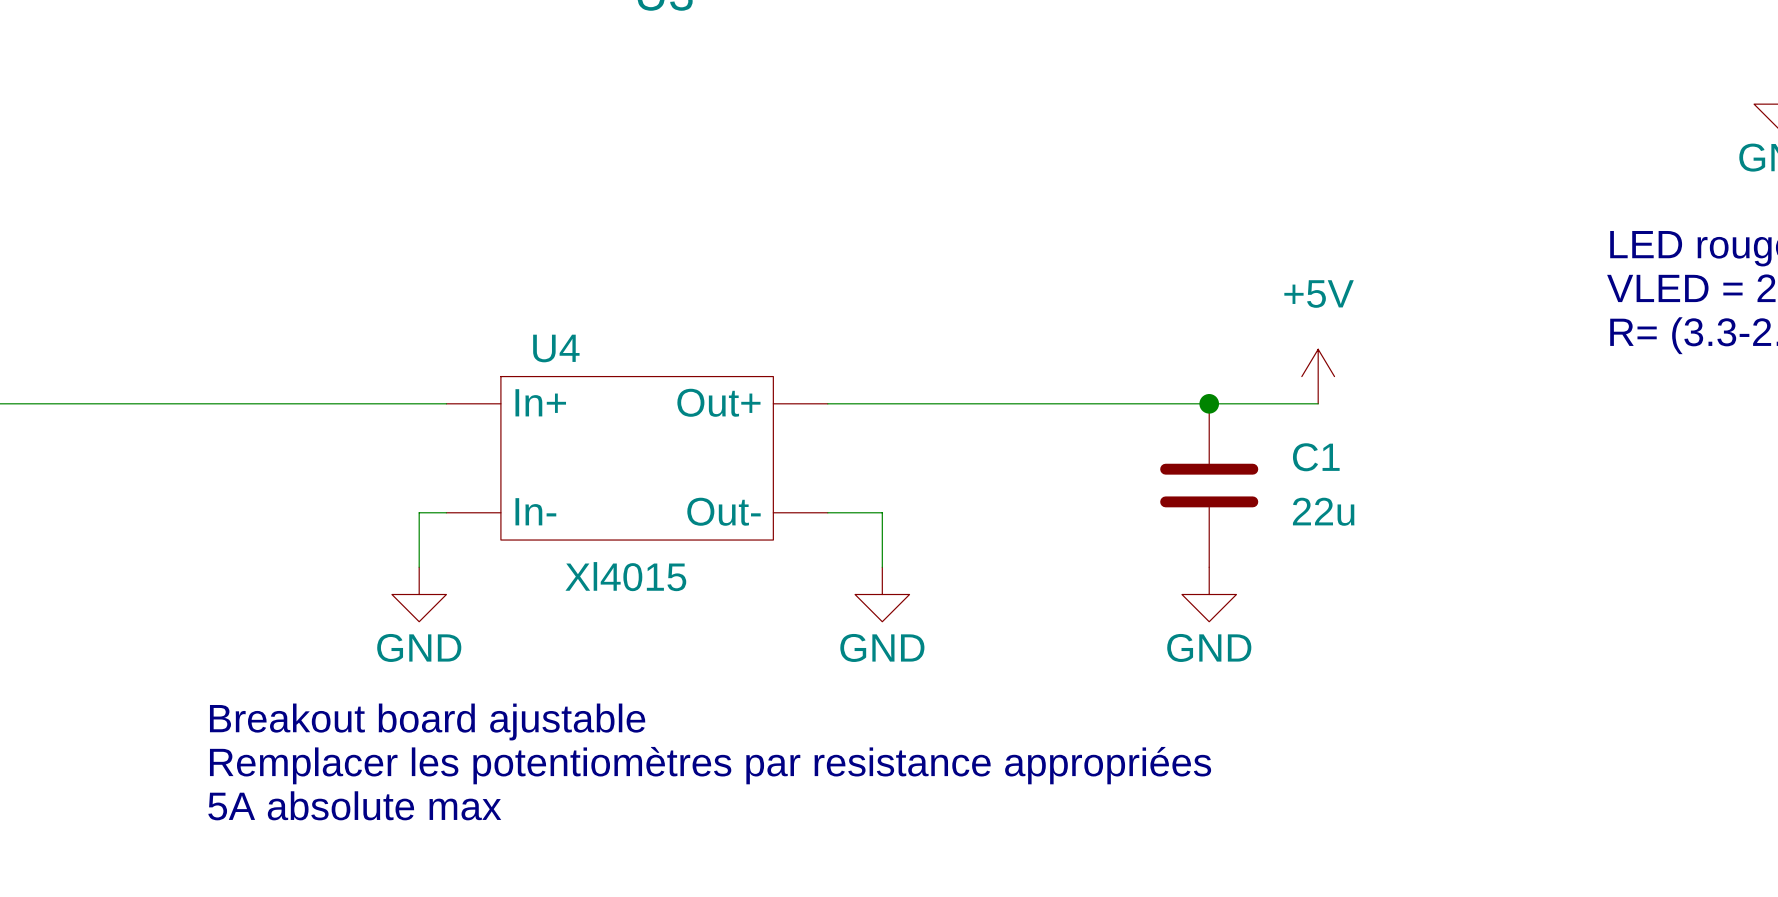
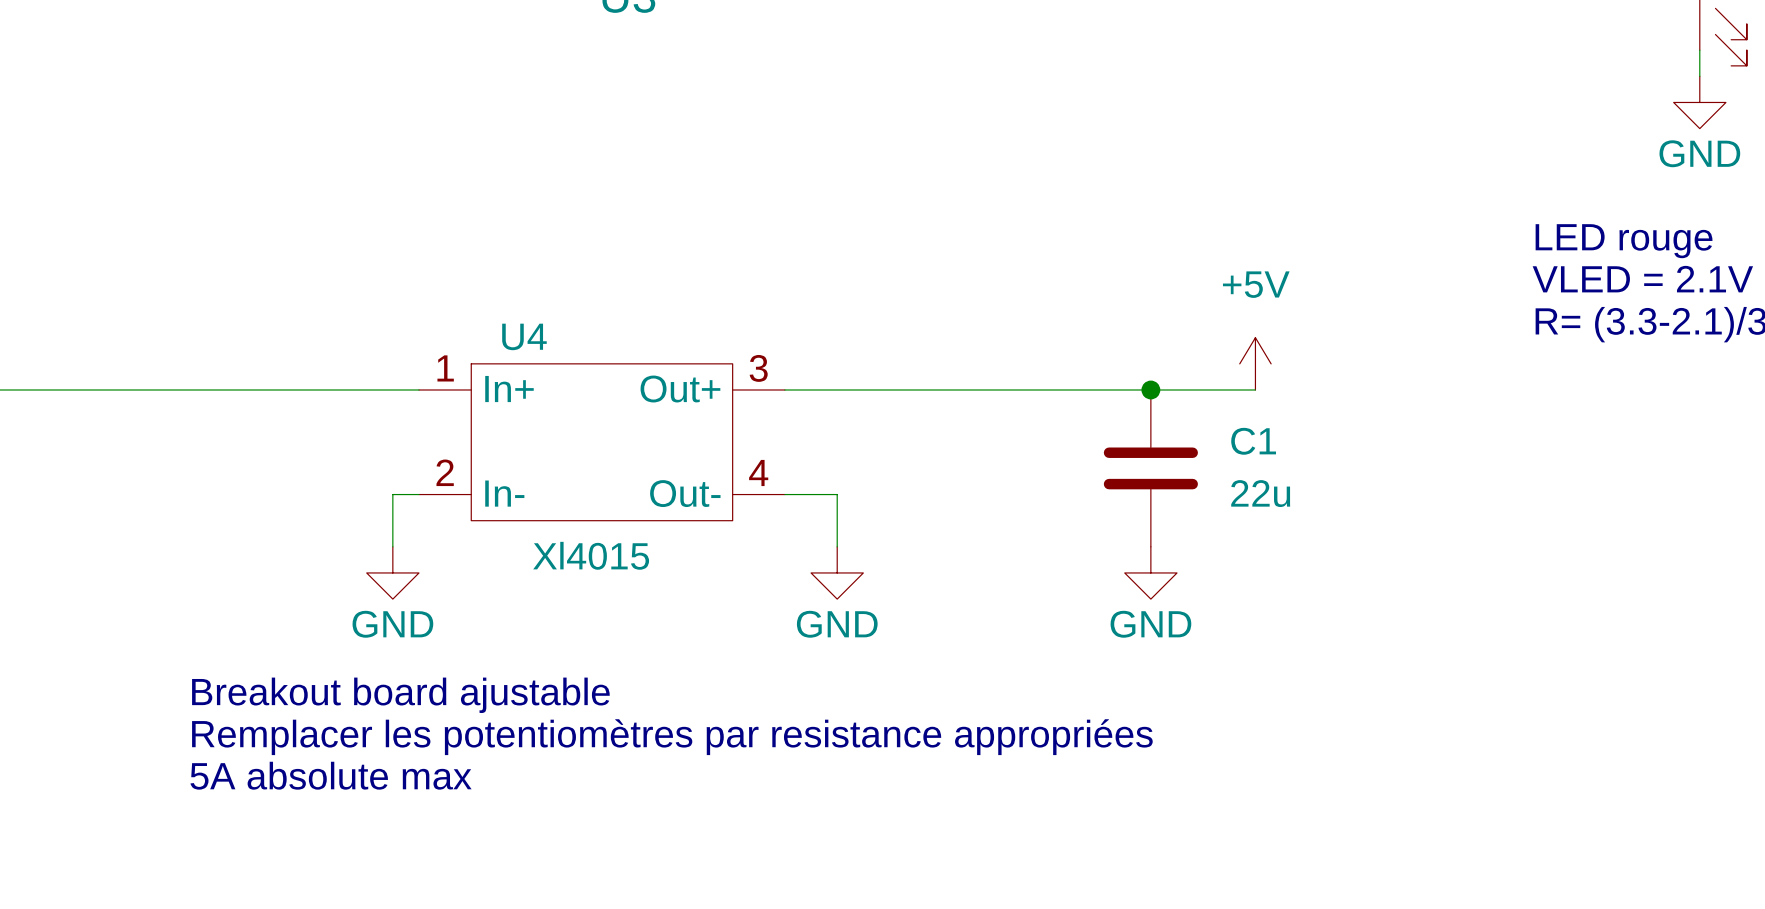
U4 pin number: none -> 1 (445, 368)
U4 pin number: none -> 3 (758, 368)
U4 pin number: none -> 2 (445, 472)
U4 pin number: none -> 4 (758, 472)

